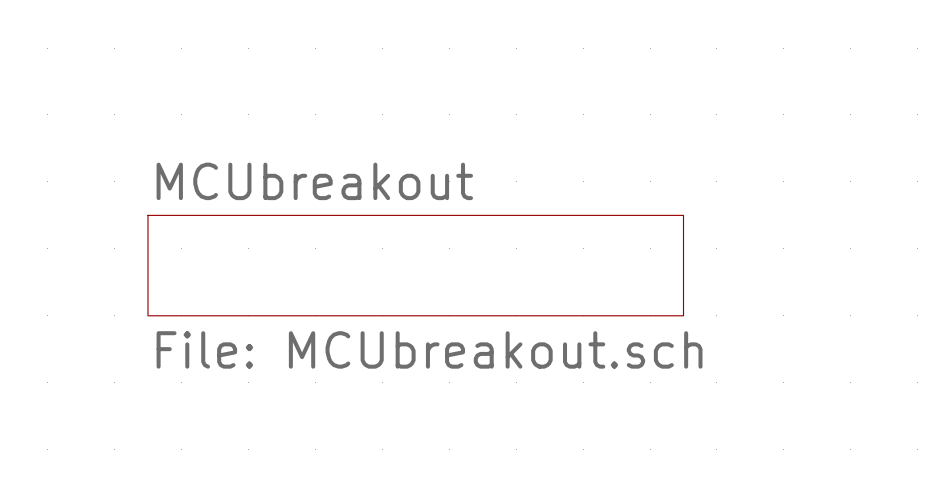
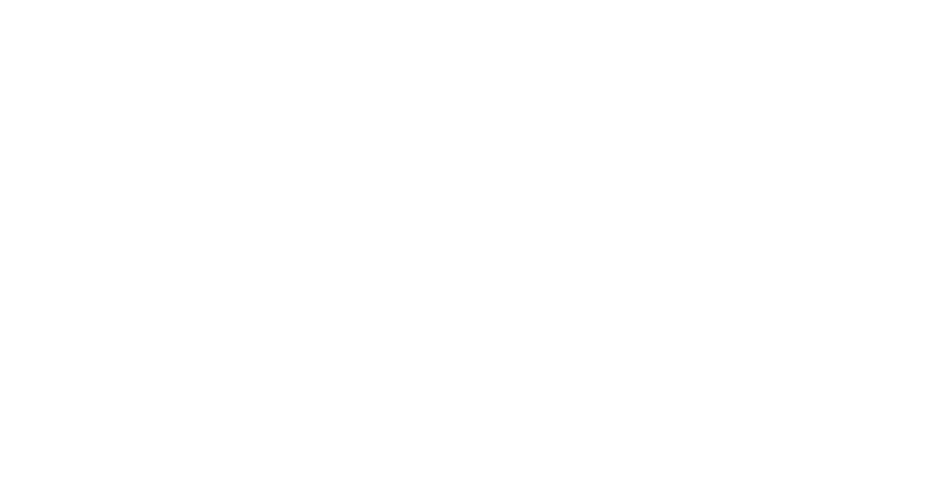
sheet MCUbreakout: File: MCUbreakout.sch (415, 265) -> none

